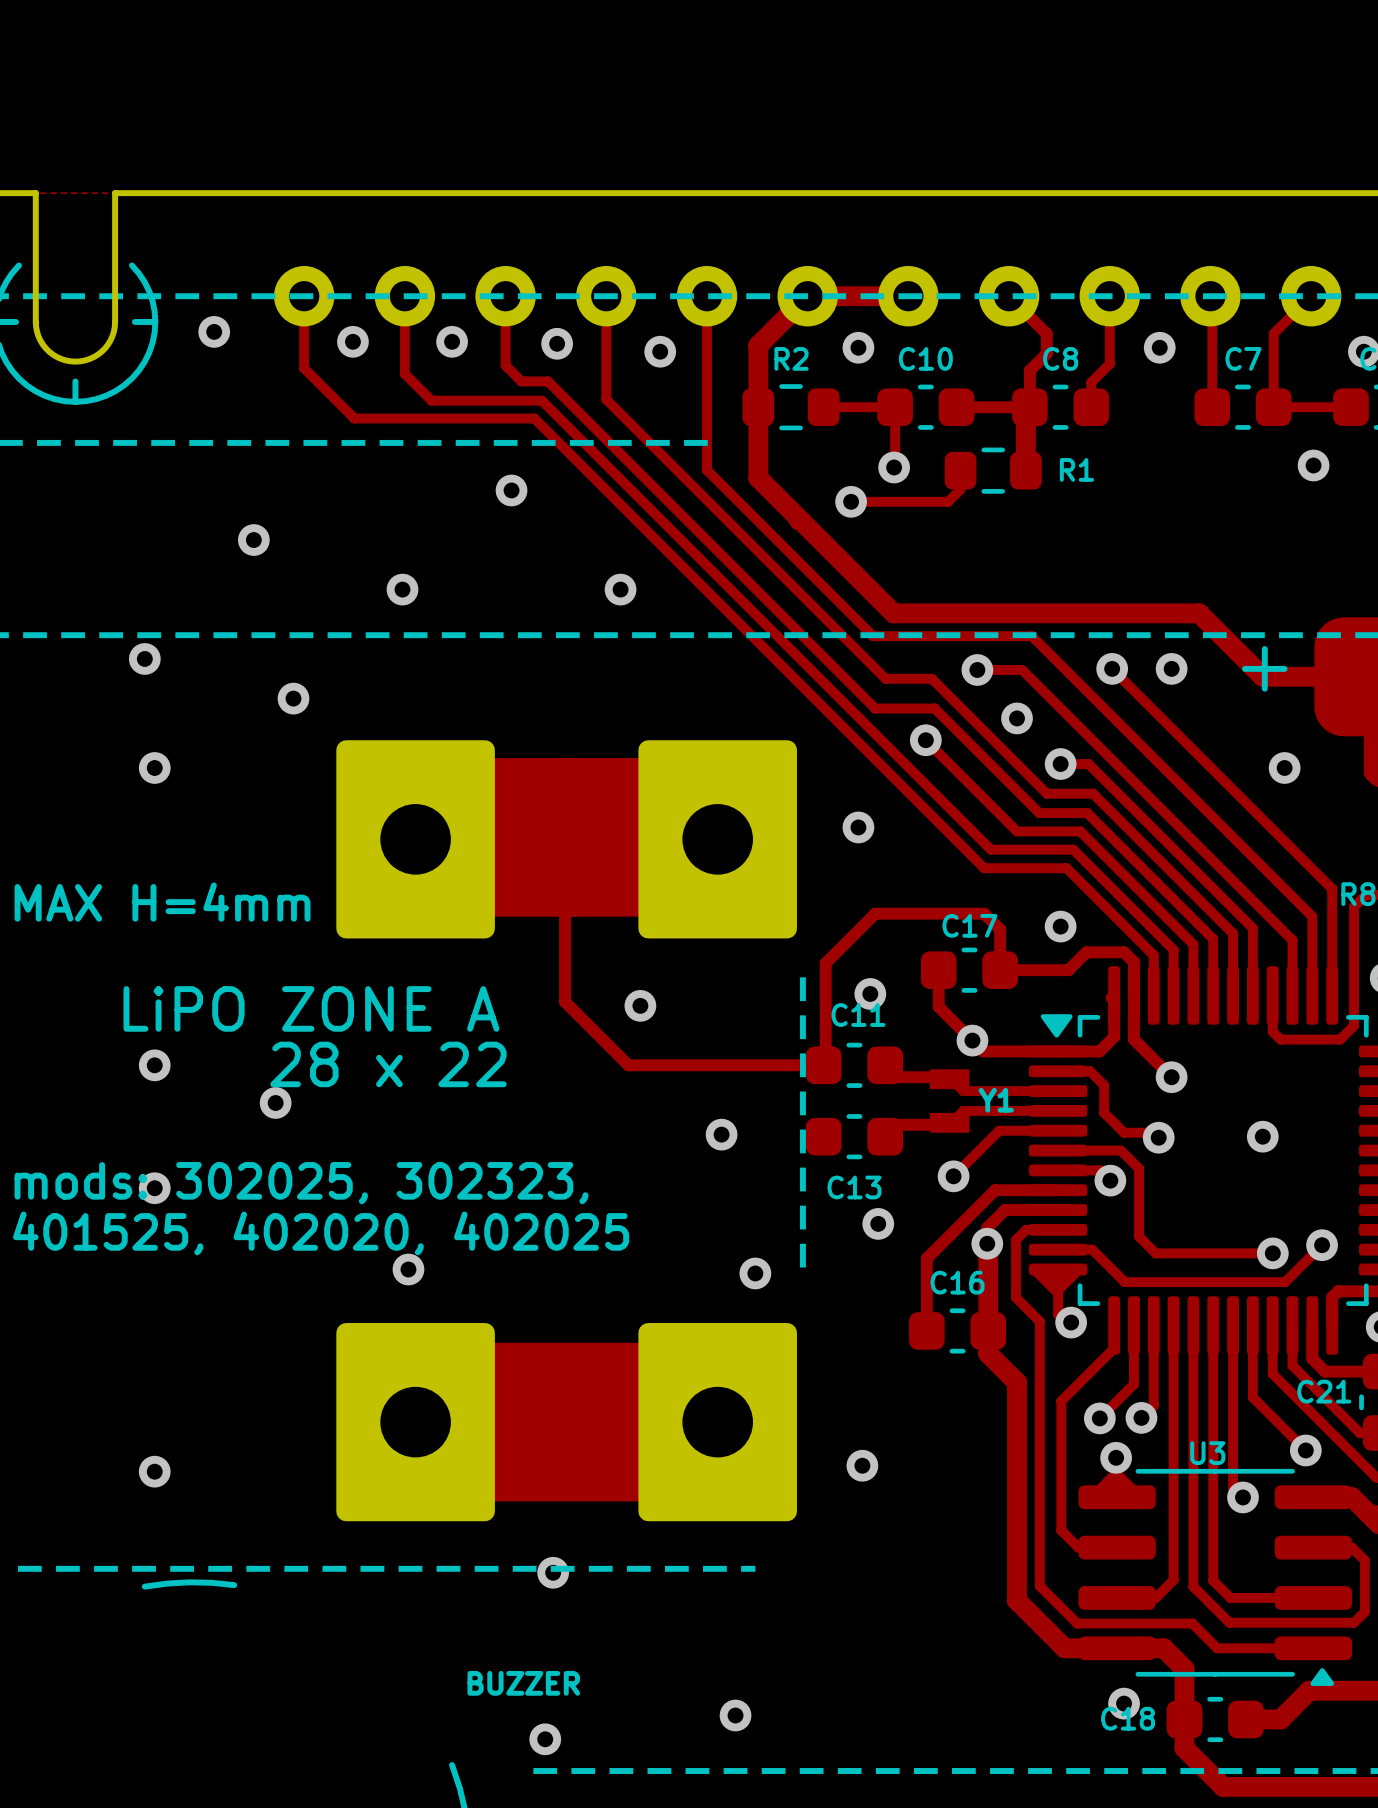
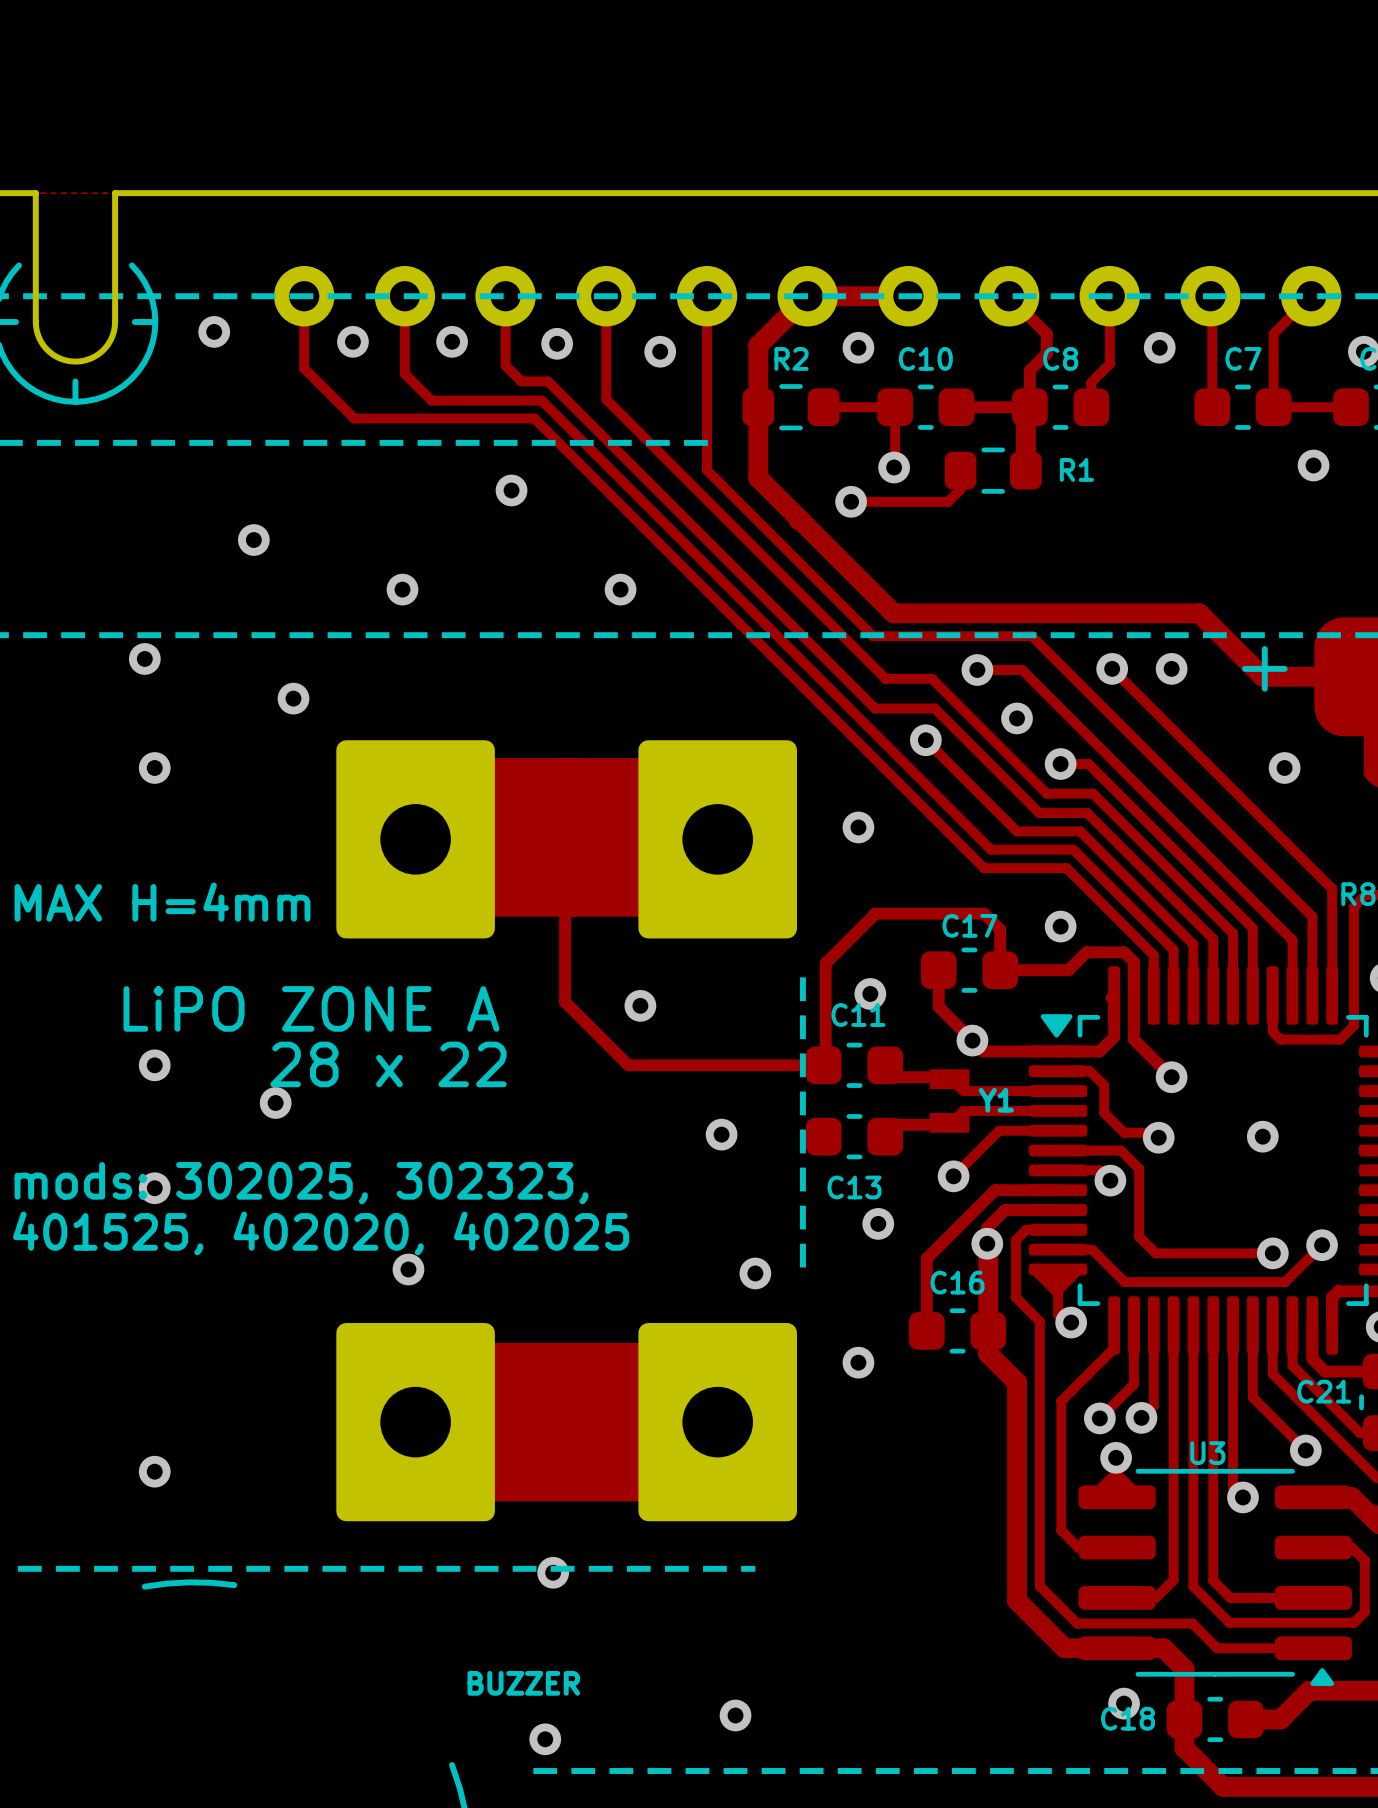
via position: (862, 1465) -> (858, 1362)

